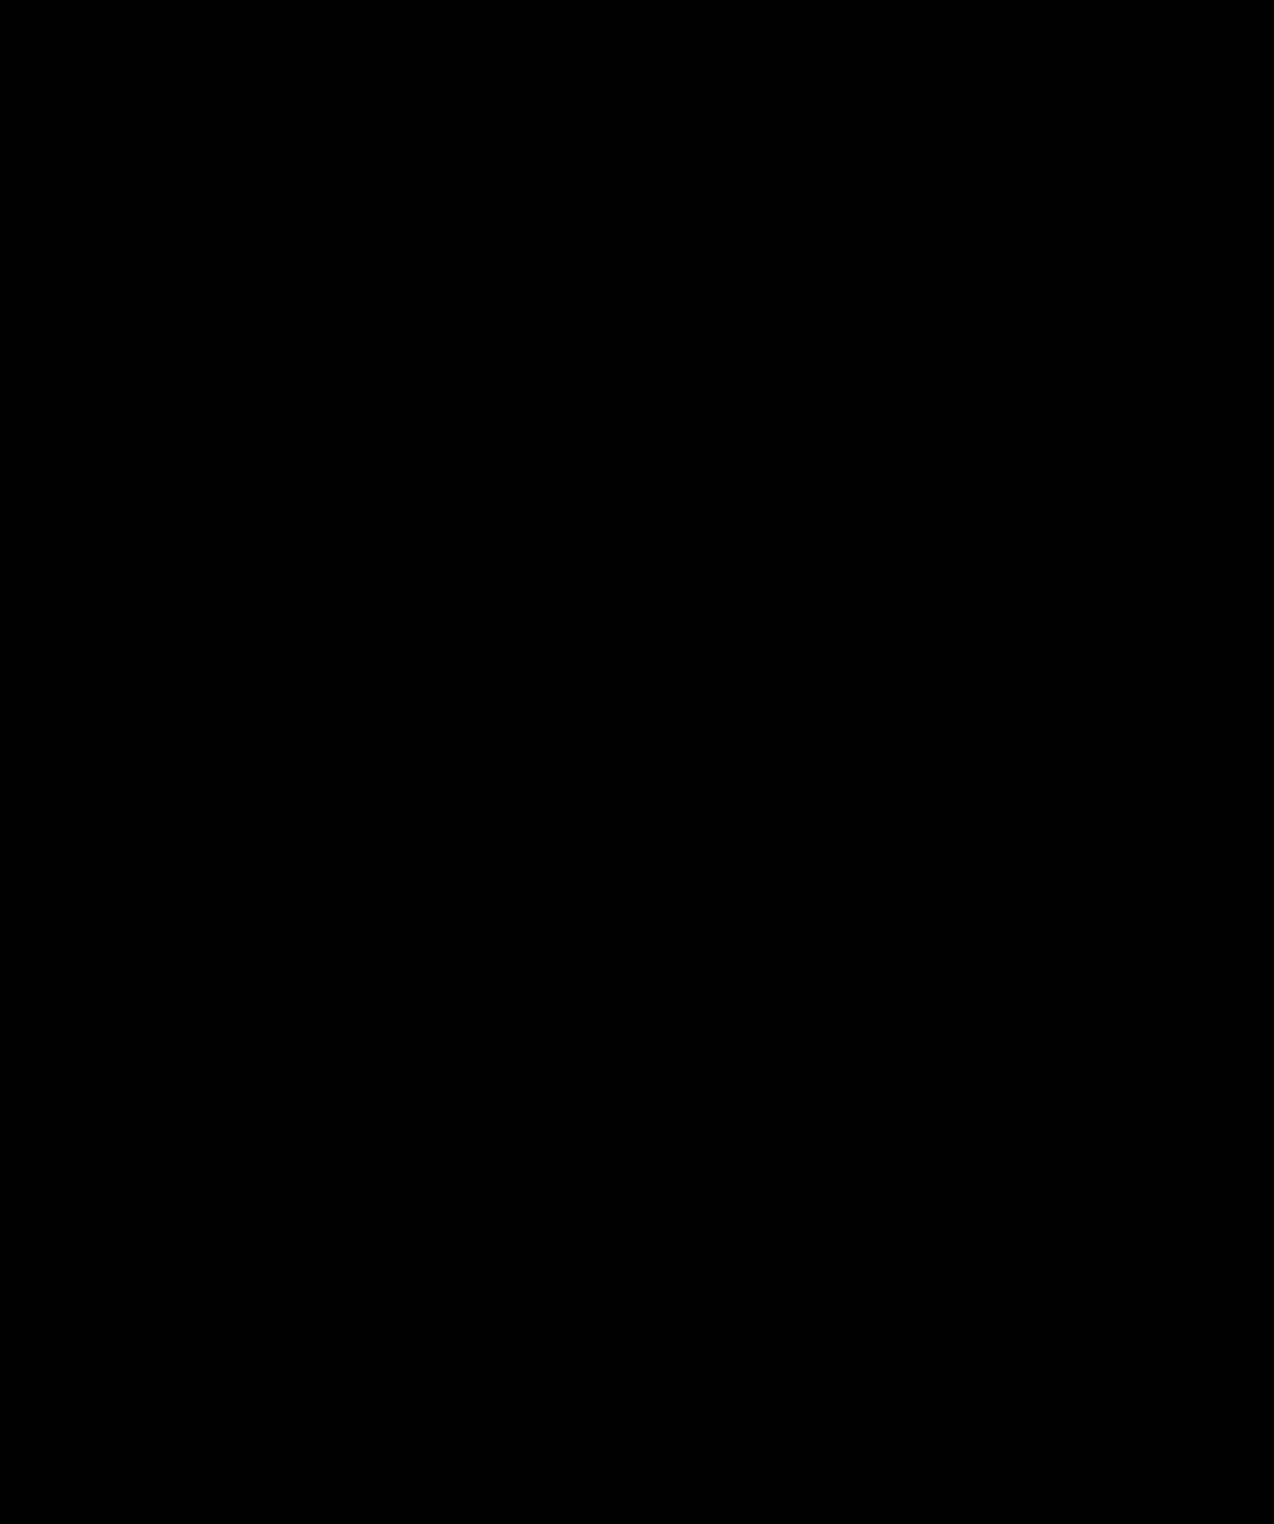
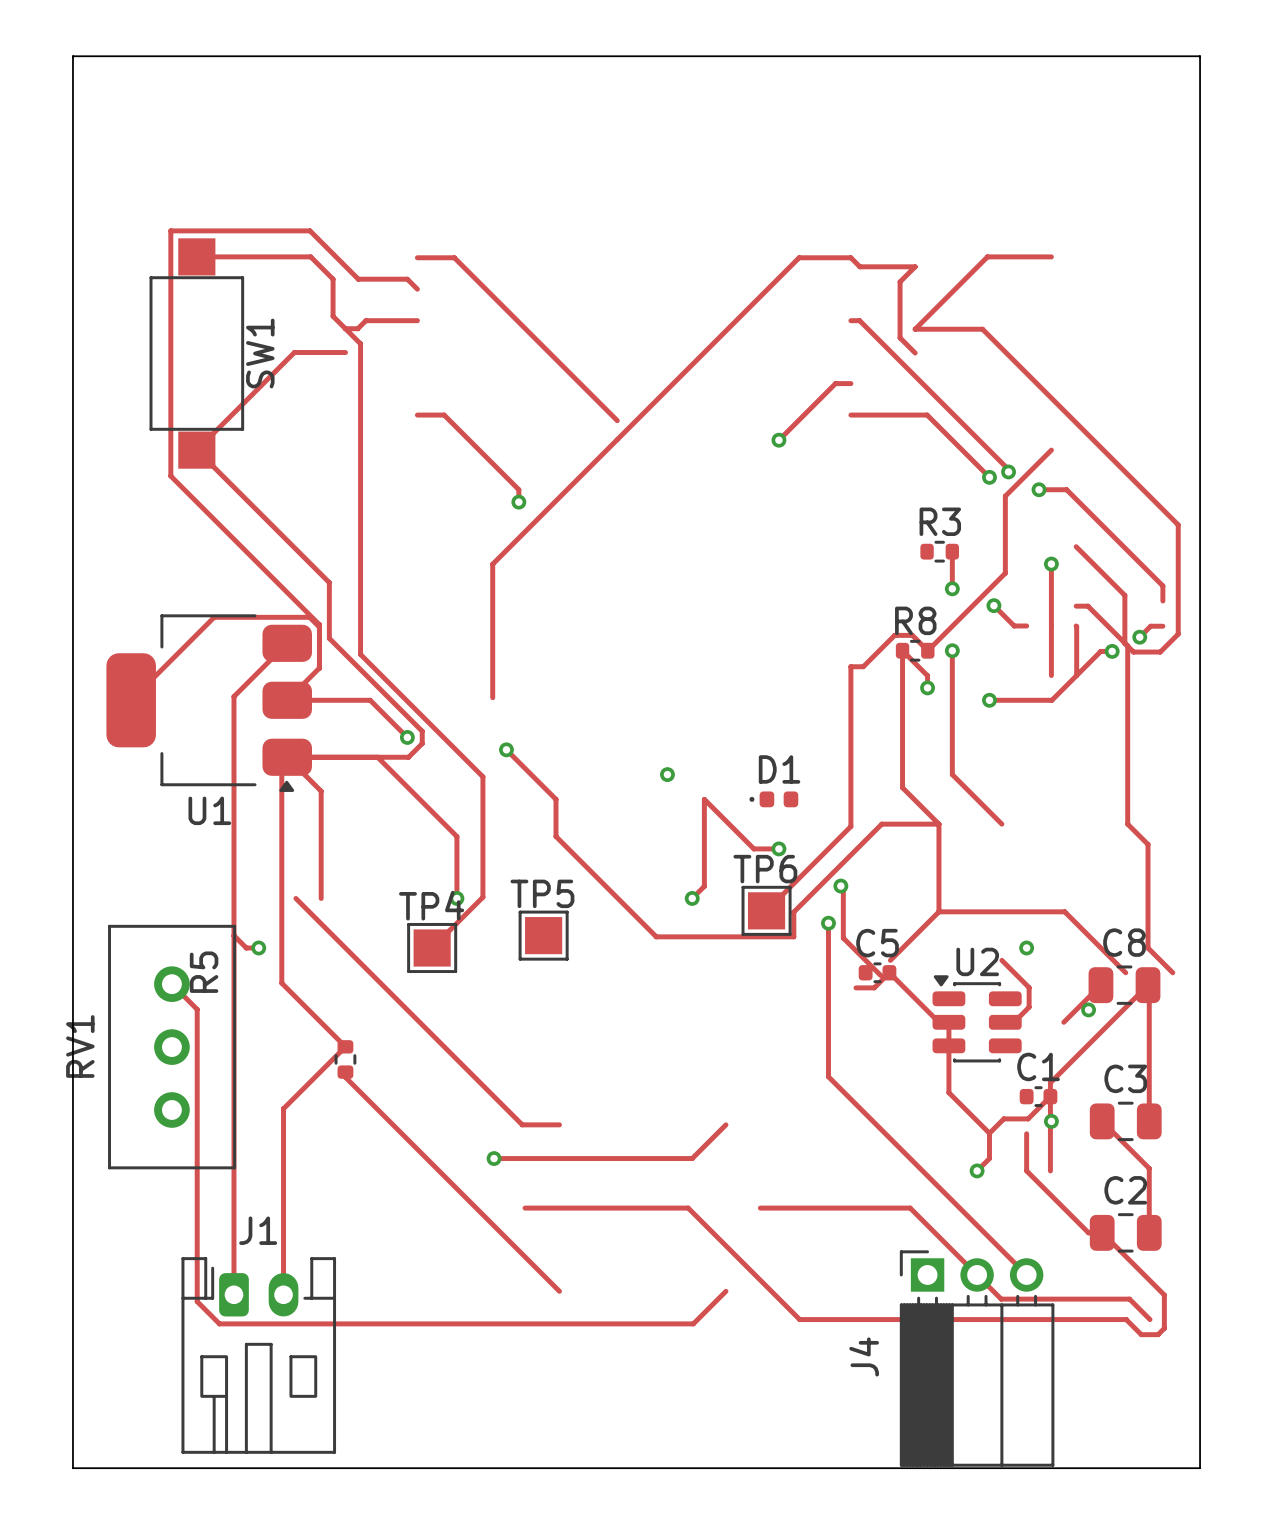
board edge: none -> (72, 56) (1200, 56) (1200, 1468) (72, 1468) (72, 56)
track: none -> (196, 256) (310, 256) (333, 279) (333, 316) (360, 343) (360, 654) (482, 776) (482, 897) (432, 948)
track: none -> (1051, 256) (987, 256) (915, 329) (982, 329) (1178, 524) (1178, 634) (1160, 652) (1133, 652) (1124, 643) (1124, 595) (1076, 546)
track: none -> (417, 257) (454, 257) (617, 420)
track: none -> (417, 289) (407, 279) (358, 279) (310, 230) (170, 230) (170, 476) (319, 624) (319, 668) (287, 700) (370, 700) (407, 737)
track: none -> (417, 320) (365, 320) (357, 328) (345, 328)
track: none -> (850, 320) (859, 320) (1008, 469) (1008, 471)
track: none -> (345, 352) (294, 352) (196, 450) (329, 582) (329, 638) (422, 731) (422, 743) (408, 757) (287, 757)
SW1: none -> (196, 353)
track: none -> (915, 353) (900, 337) (900, 281) (915, 266) (859, 266) (850, 257) (799, 257) (492, 564) (492, 697)
track: none -> (850, 383) (835, 383) (778, 440)
track: none -> (417, 415) (444, 415) (518, 489) (518, 502)
track: none -> (850, 415) (927, 415) (989, 477)
via: none -> (778, 440)
track: none -> (1051, 450) (1005, 496) (1005, 573) (927, 650) (912, 635) (894, 635) (863, 666) (850, 666) (850, 826) (766, 910)
via: none -> (1008, 471)
via: none -> (989, 477)
track: none -> (1039, 489) (1066, 489) (1162, 585) (1162, 600)
via: none -> (1039, 489)
via: none -> (518, 502)
R3: none -> (939, 551)
track: none -> (952, 551) (952, 588)
track: none -> (1051, 564) (1051, 675)
via: none -> (1051, 564)
via: none -> (952, 588)
track: none -> (993, 605) (1014, 625) (1026, 625)
via: none -> (993, 605)
track: none -> (1076, 606) (1087, 606) (1127, 645) (1127, 824) (1148, 844) (1148, 948) (1172, 972)
track: none -> (1076, 625) (1076, 675)
track: none -> (1162, 626) (1150, 626) (1139, 637)
track: none -> (319, 627) (309, 617) (214, 617) (131, 700)
via: none -> (1139, 637)
track: none -> (287, 643) (233, 696) (233, 1294)
R8: none -> (915, 650)
track: none -> (952, 650) (952, 774) (1001, 824)
via: none -> (952, 650)
track: none -> (1112, 651) (1100, 651) (1051, 700) (989, 700)
via: none -> (1112, 651)
track: none -> (927, 687) (927, 675) (902, 650) (902, 787) (938, 824)
via: none -> (927, 687)
via: none -> (989, 700)
U1: none -> (209, 703)
via: none -> (407, 737)
track: none -> (506, 749) (556, 799) (556, 836) (656, 936) (793, 936) (793, 912) (881, 824) (938, 824)
via: none -> (506, 749)
track: none -> (287, 757) (281, 762) (281, 983) (345, 1046) (283, 1108) (283, 1294)
track: none -> (287, 757) (321, 791) (321, 898)
track: none -> (377, 757) (456, 836) (456, 898)
via: none -> (667, 774)
D1: none -> (773, 799)
track: none -> (938, 824) (938, 911)
track: none -> (778, 848) (753, 848) (704, 799) (704, 886) (692, 898)
via: none -> (778, 848)
track: none -> (840, 886) (843, 888) (843, 938) (880, 975)
via: none -> (840, 886)
track: none -> (295, 898) (522, 1124) (559, 1124)
via: none -> (456, 898)
via: none -> (692, 898)
TP6: none -> (766, 910)
track: none -> (938, 911) (1064, 911) (1125, 972)
track: none -> (938, 911) (890, 960)
track: none -> (828, 923) (828, 1076) (1026, 1274)
via: none -> (828, 923)
track: none -> (233, 935) (246, 948) (258, 948)
TP5: none -> (543, 935)
via: none -> (258, 948)
TP4: none -> (432, 948)
via: none -> (1026, 948)
track: none -> (1001, 960) (1029, 987) (1029, 1007) (1014, 1022) (1005, 1022)
C5: none -> (877, 972)
track: none -> (171, 984) (197, 1009) (197, 1301) (219, 1323) (693, 1323) (725, 1291)
track: none -> (1100, 985) (1063, 1022)
C8: none -> (1124, 985)
track: none -> (855, 987) (874, 987) (889, 972) (938, 1022) (948, 1022) (948, 1092) (989, 1133)
via: none -> (1088, 1009)
U2: none -> (977, 1018)
RV1: none -> (172, 1047)
R5: none -> (345, 1059)
track: none -> (345, 1072) (345, 1077) (559, 1291)
C1: none -> (1038, 1096)
track: none -> (1050, 1096) (1028, 1118) (1003, 1118) (989, 1133)
via: none -> (1051, 1121)
track: none -> (1102, 1121) (1149, 1168) (1149, 1232)
C3: none -> (1125, 1121)
track: none -> (1149, 1121) (1148, 985) (1050, 1082) (1050, 1170)
track: none -> (725, 1124) (692, 1158) (494, 1158)
track: none -> (989, 1133) (989, 1158) (977, 1170)
track: none -> (1026, 1133) (1026, 1170) (1088, 1232) (1102, 1232) (1164, 1295) (1164, 1328) (1158, 1334) (1141, 1334) (1126, 1319) (799, 1319) (688, 1208) (525, 1208)
via: none -> (494, 1158)
via: none -> (977, 1170)
track: none -> (760, 1208) (910, 1208) (1001, 1299) (1129, 1299) (1150, 1319)
C2: none -> (1125, 1232)
J1: none -> (258, 1355)
J4: none -> (977, 1358)

